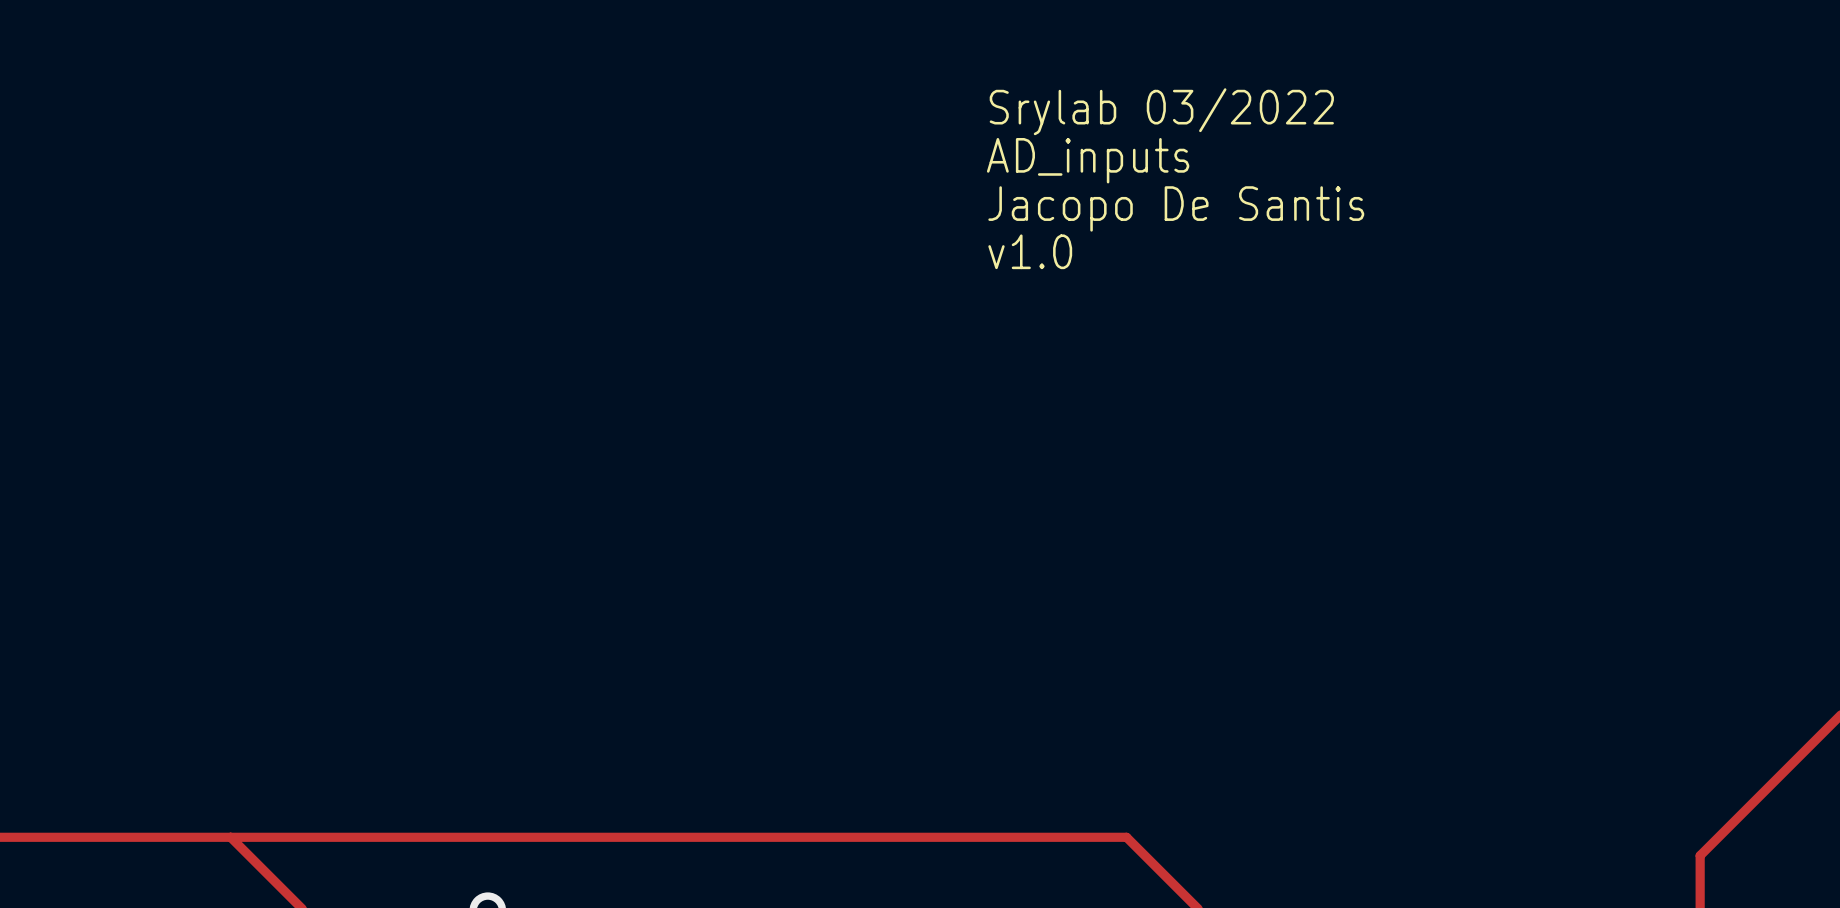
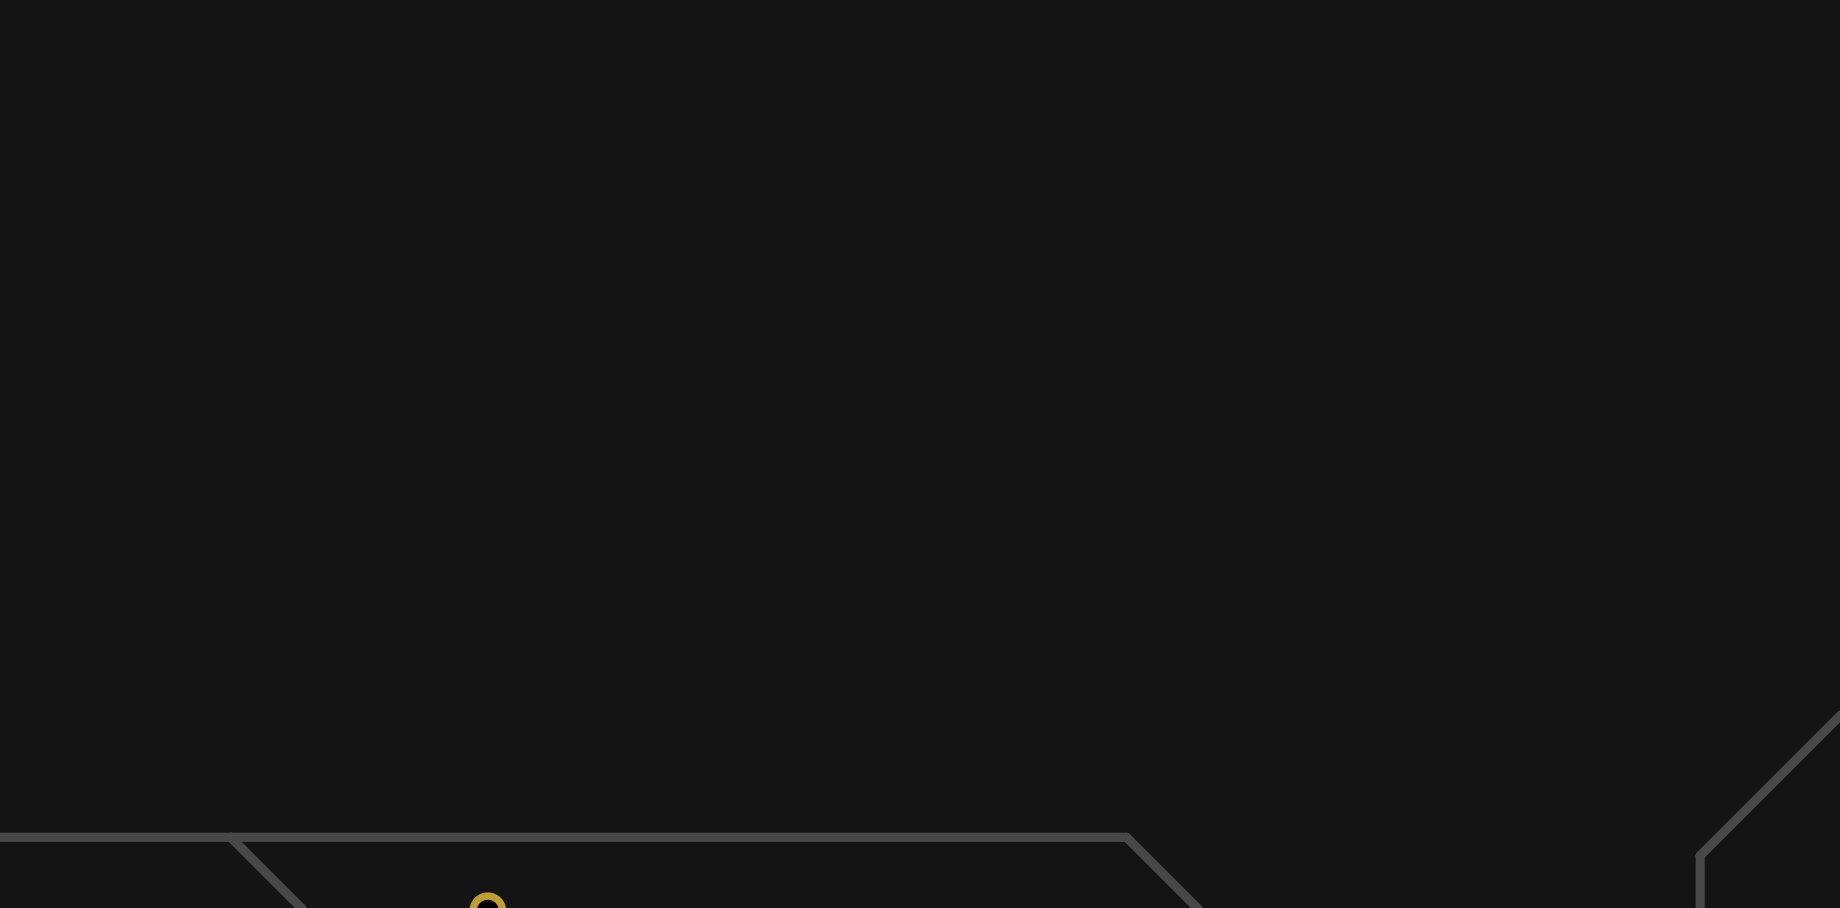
text: Srylab 03/2022 (1161, 111) -> none
text: AD_inputs (1088, 160) -> none
text: Jacopo De Santis (1176, 208) -> none
text: v1.0 (1030, 251) -> none

